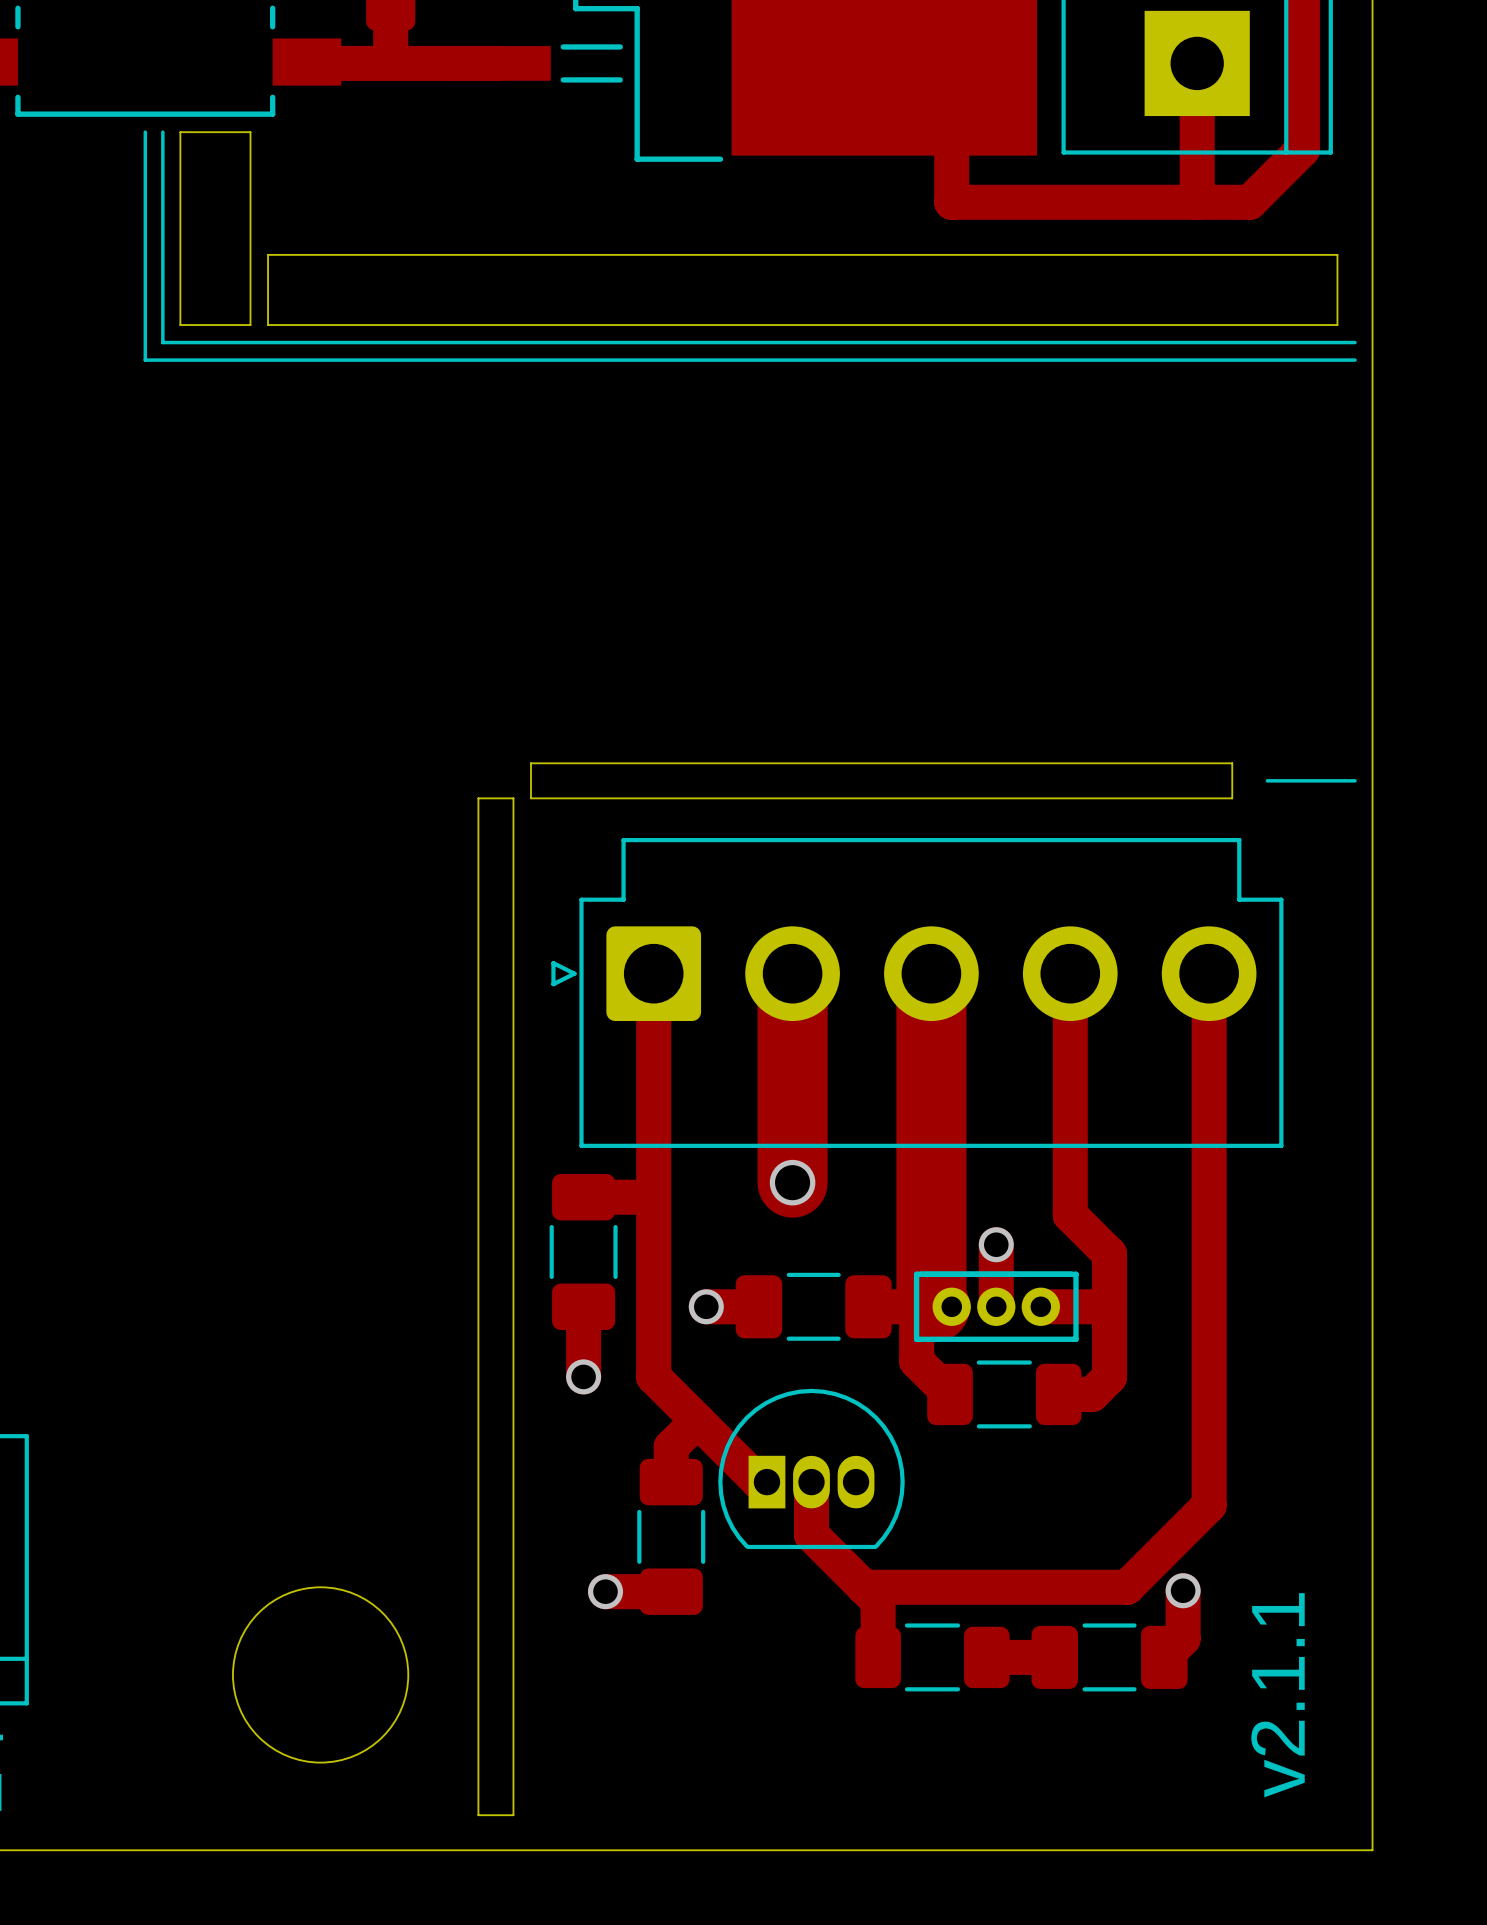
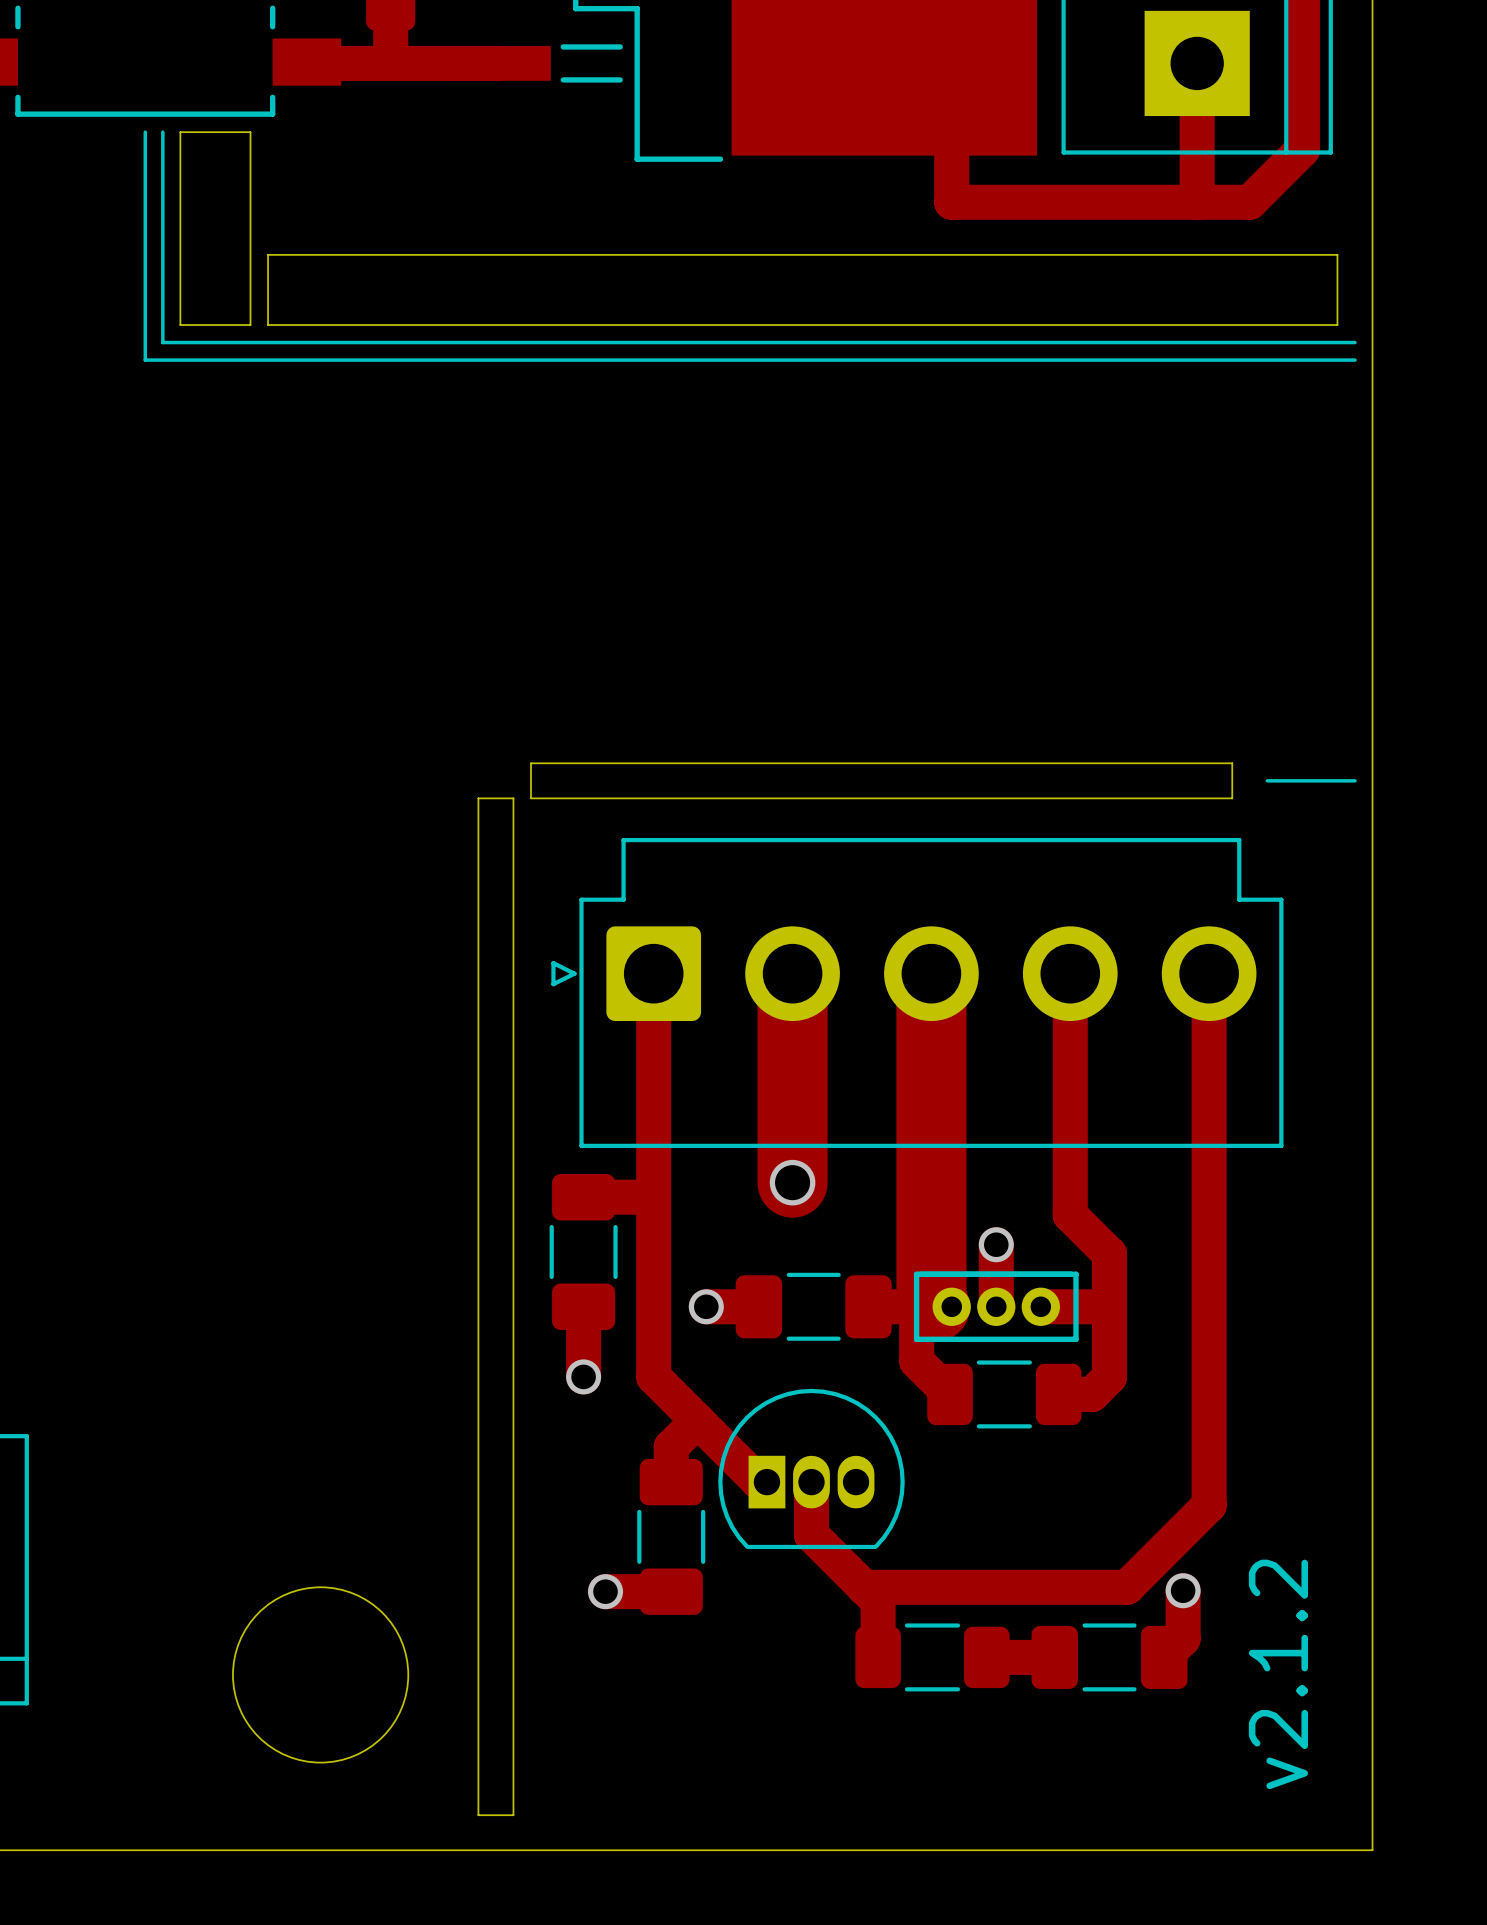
text: v2.1.1 (1278, 1695) -> v2.1.2 (1278, 1674)

